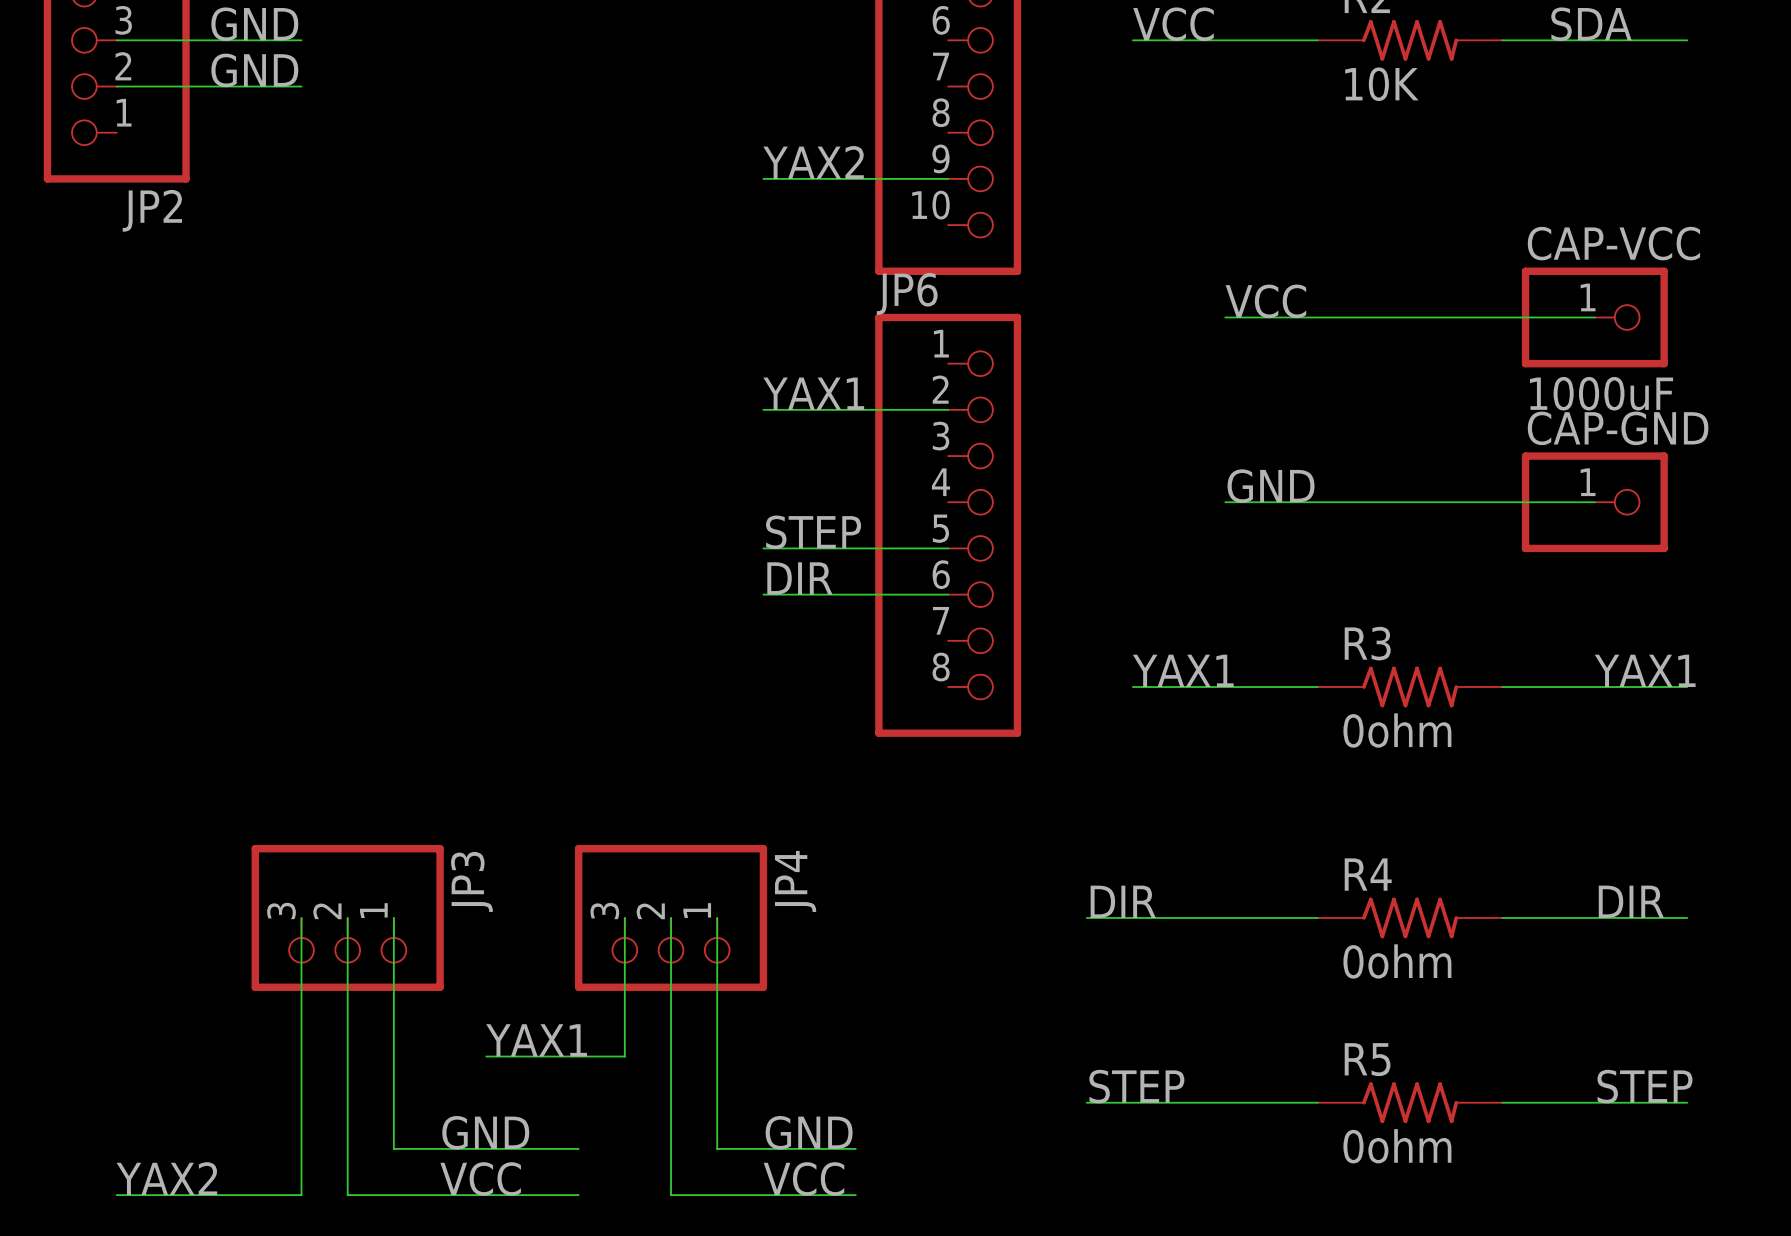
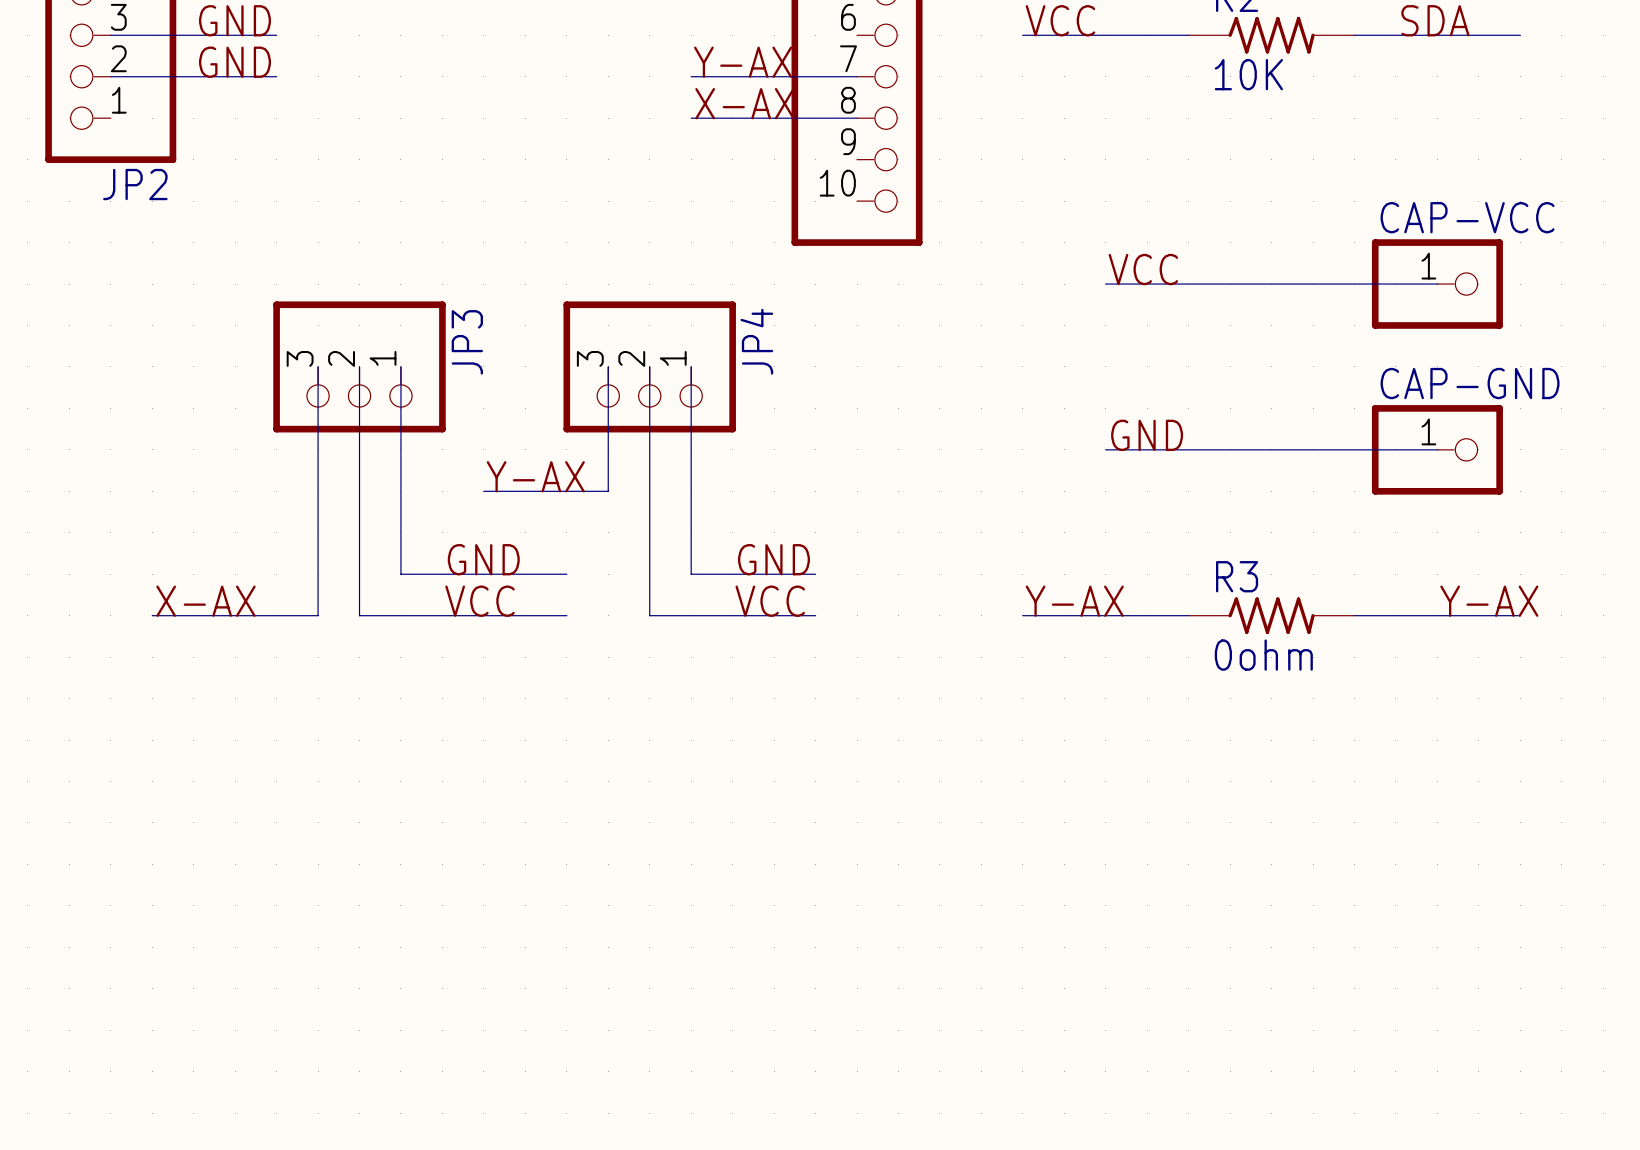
label: none -> Y-AX (743, 62)
wire: none -> (691, 76) (857, 76)
label: none -> X-AX (744, 103)
label: YAX2 (813, 162) -> none
wire: (763, 178) (948, 178) -> (691, 118) (857, 118)
label: YAX1 (813, 393) -> none
CAP-VCC value: 1000uF (1601, 393) -> none
wire: none -> (318, 366) (318, 615) (152, 615)
wire: none -> (359, 366) (359, 615) (566, 615)
wire: none -> (400, 366) (400, 574) (566, 574)
wire: none -> (608, 366) (608, 491) (483, 491)
wire: none -> (649, 366) (649, 615) (815, 615)
wire: (763, 409) (948, 409) -> (691, 366) (691, 574) (815, 574)
JP6: (948, 525) -> none
label: none -> Y-AX (535, 476)
label: STEP (813, 532) -> none
wire: (763, 548) (948, 548) -> none
label: DIR (799, 578) -> none
wire: (763, 594) (948, 594) -> none
label: none -> GND (483, 559)
label: none -> GND (773, 559)
label: none -> X-AX (205, 601)
label: none -> VCC (480, 601)
label: none -> VCC (770, 601)
label: YAX1 (1183, 670) -> Y-AX (1074, 601)
label: YAX1 (1645, 670) -> Y-AX (1489, 601)
label: DIR (1123, 901) -> none
label: DIR (1631, 901) -> none
wire: (301, 917) (301, 1195) (116, 1195) -> none
wire: (347, 917) (347, 1195) (578, 1195) -> none
JP3 position: (347, 917) -> (359, 366)
wire: (393, 917) (393, 1148) (578, 1148) -> none
wire: (624, 917) (624, 1056) (486, 1056) -> none
wire: (671, 917) (671, 1195) (855, 1195) -> none
JP4 position: (671, 917) -> (649, 366)
wire: (717, 917) (717, 1148) (855, 1148) -> none
wire: (1086, 917) (1317, 917) -> none
R4: 0ohm (1410, 917) -> none
wire: (1502, 917) (1687, 917) -> none
label: YAX1 (536, 1040) -> none
label: STEP (1136, 1086) -> none
label: STEP (1644, 1086) -> none
wire: (1086, 1102) (1317, 1102) -> none
R5: 0ohm (1410, 1102) -> none
wire: (1502, 1102) (1687, 1102) -> none
label: GND (485, 1132) -> none
label: GND (809, 1132) -> none
label: YAX2 (166, 1178) -> none
label: VCC (480, 1178) -> none
label: VCC (804, 1178) -> none

